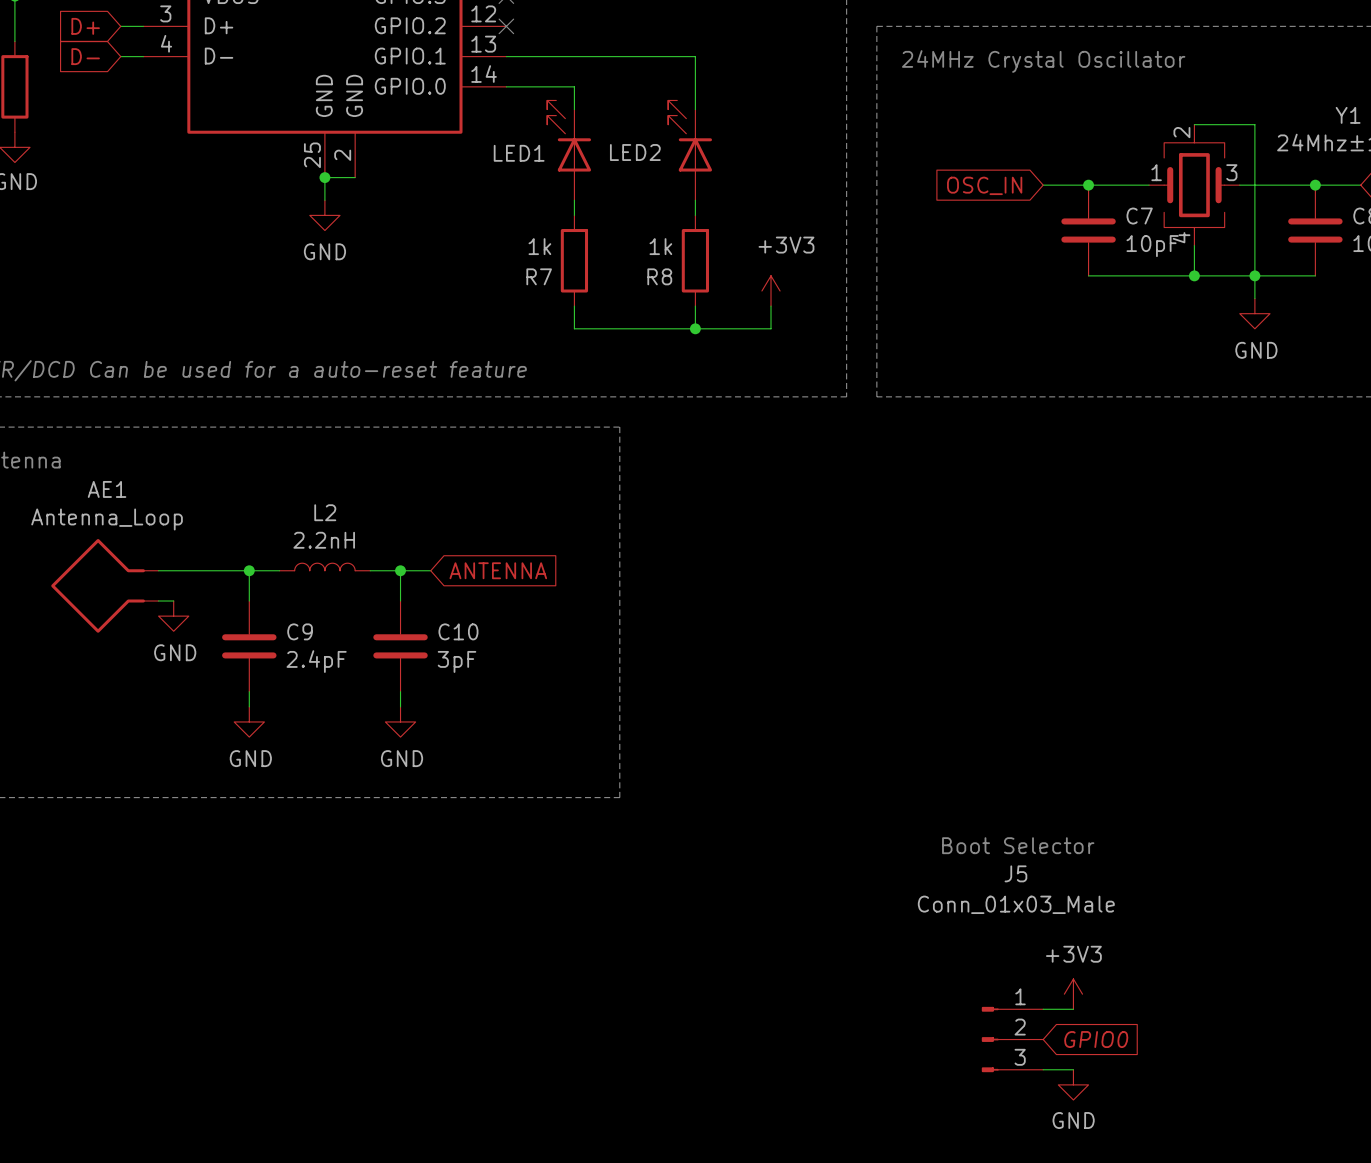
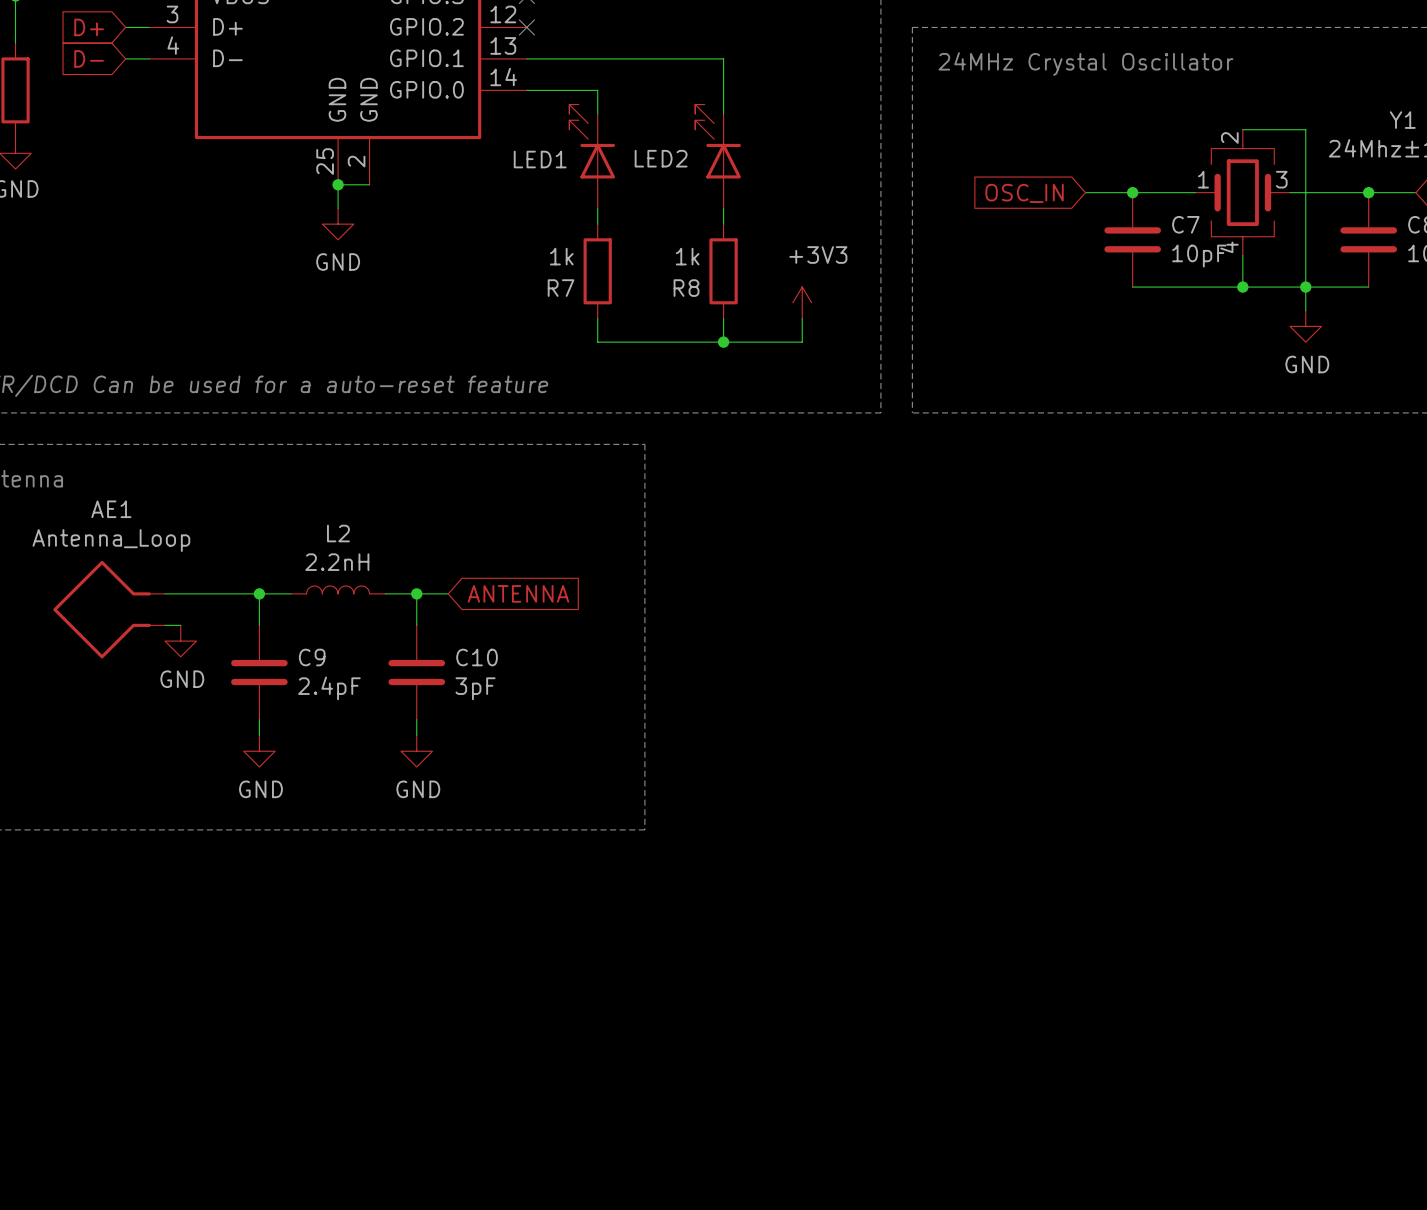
text: Boot Selector (1018, 845) -> none
power symbol: +3V3 (1073, 994) -> none
wire: (1043, 1009) (1073, 1009) -> none
J5: Conn_01x03_Male (1012, 1039) -> none
global label: GPIO0 (1096, 1039) -> none
wire: (1043, 1069) (1073, 1069) -> none
power symbol: GND (1073, 1084) -> none

